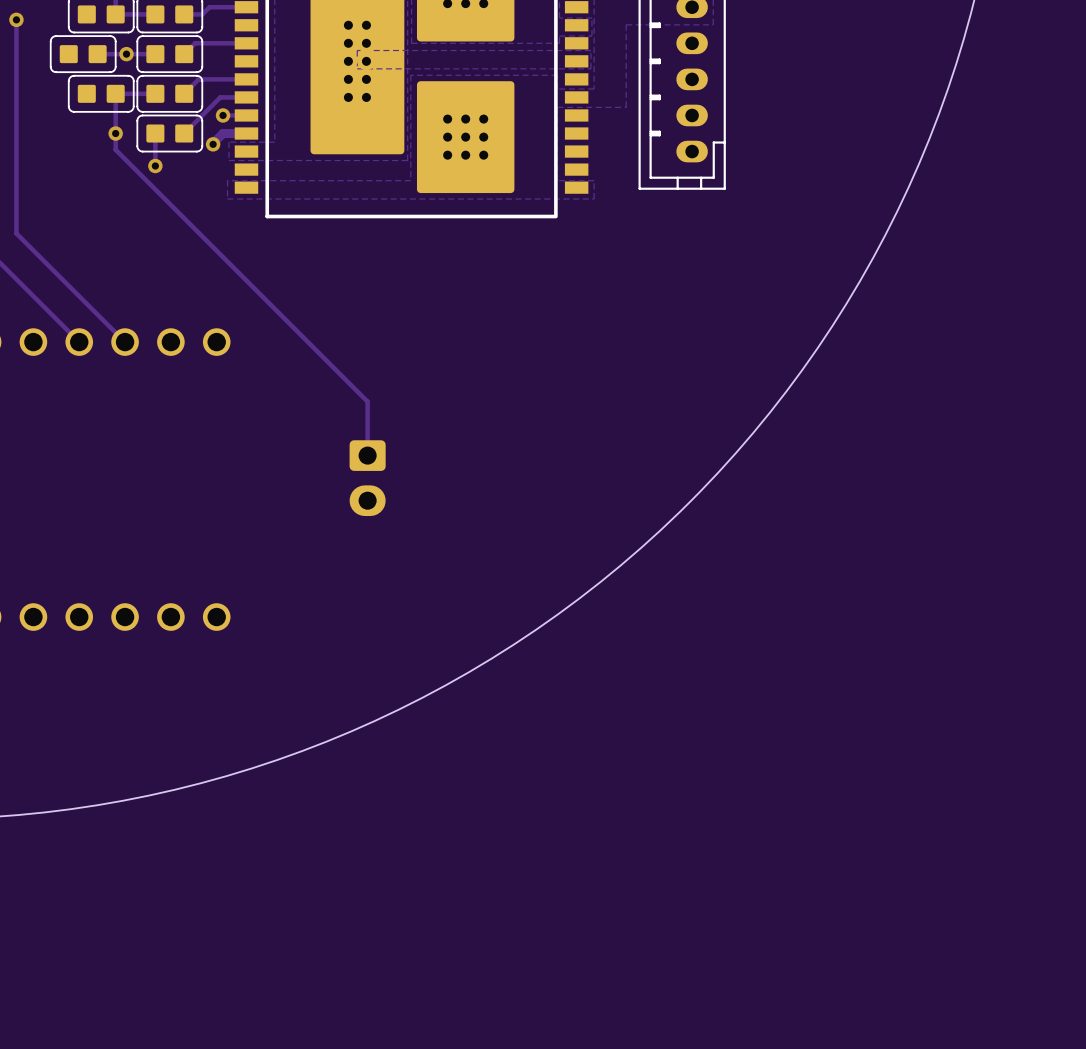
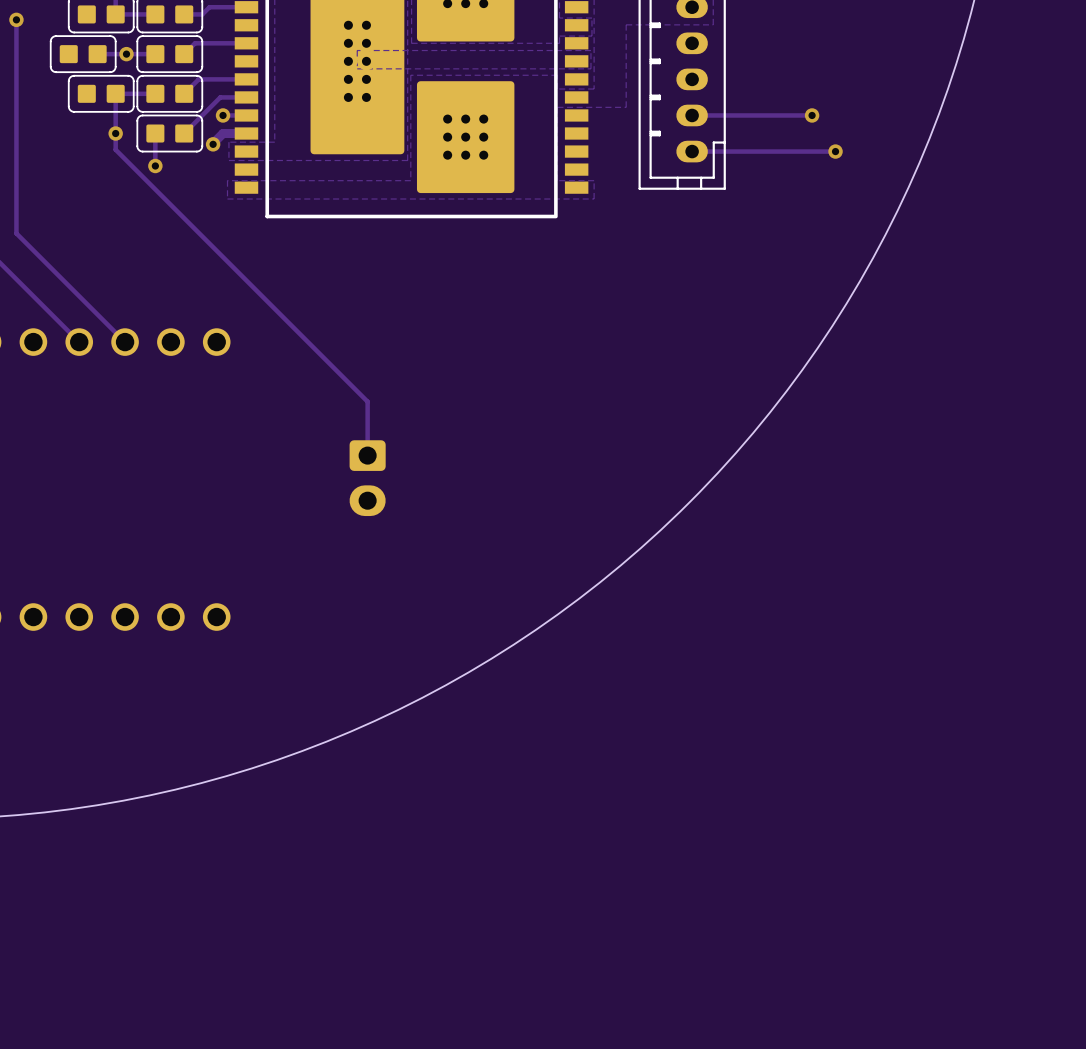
track: none -> (812, 115) (692, 115)
via: none -> (812, 115)
track: none -> (835, 151) (692, 151)
via: none -> (835, 151)

